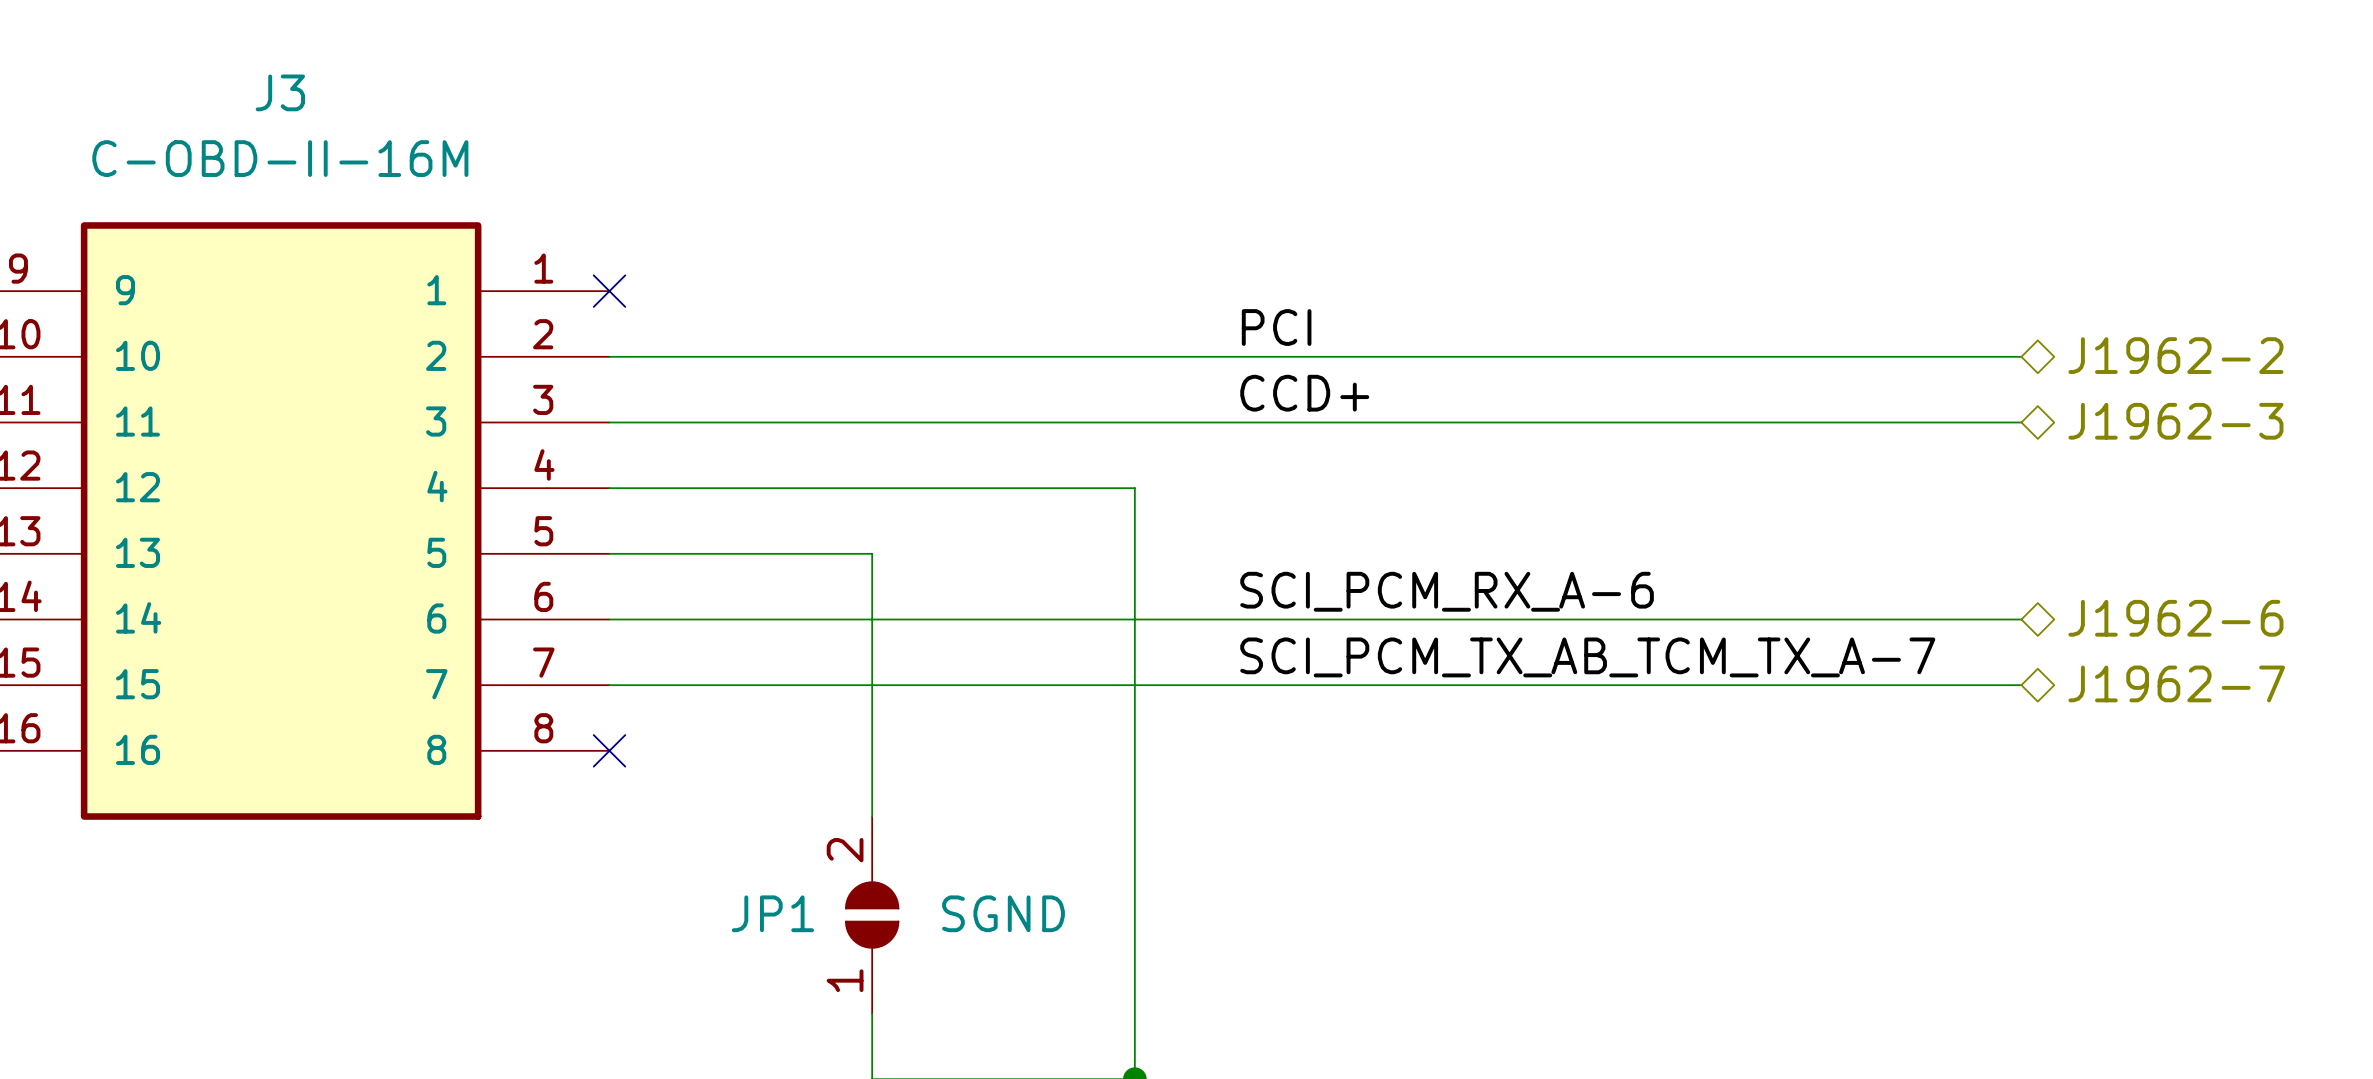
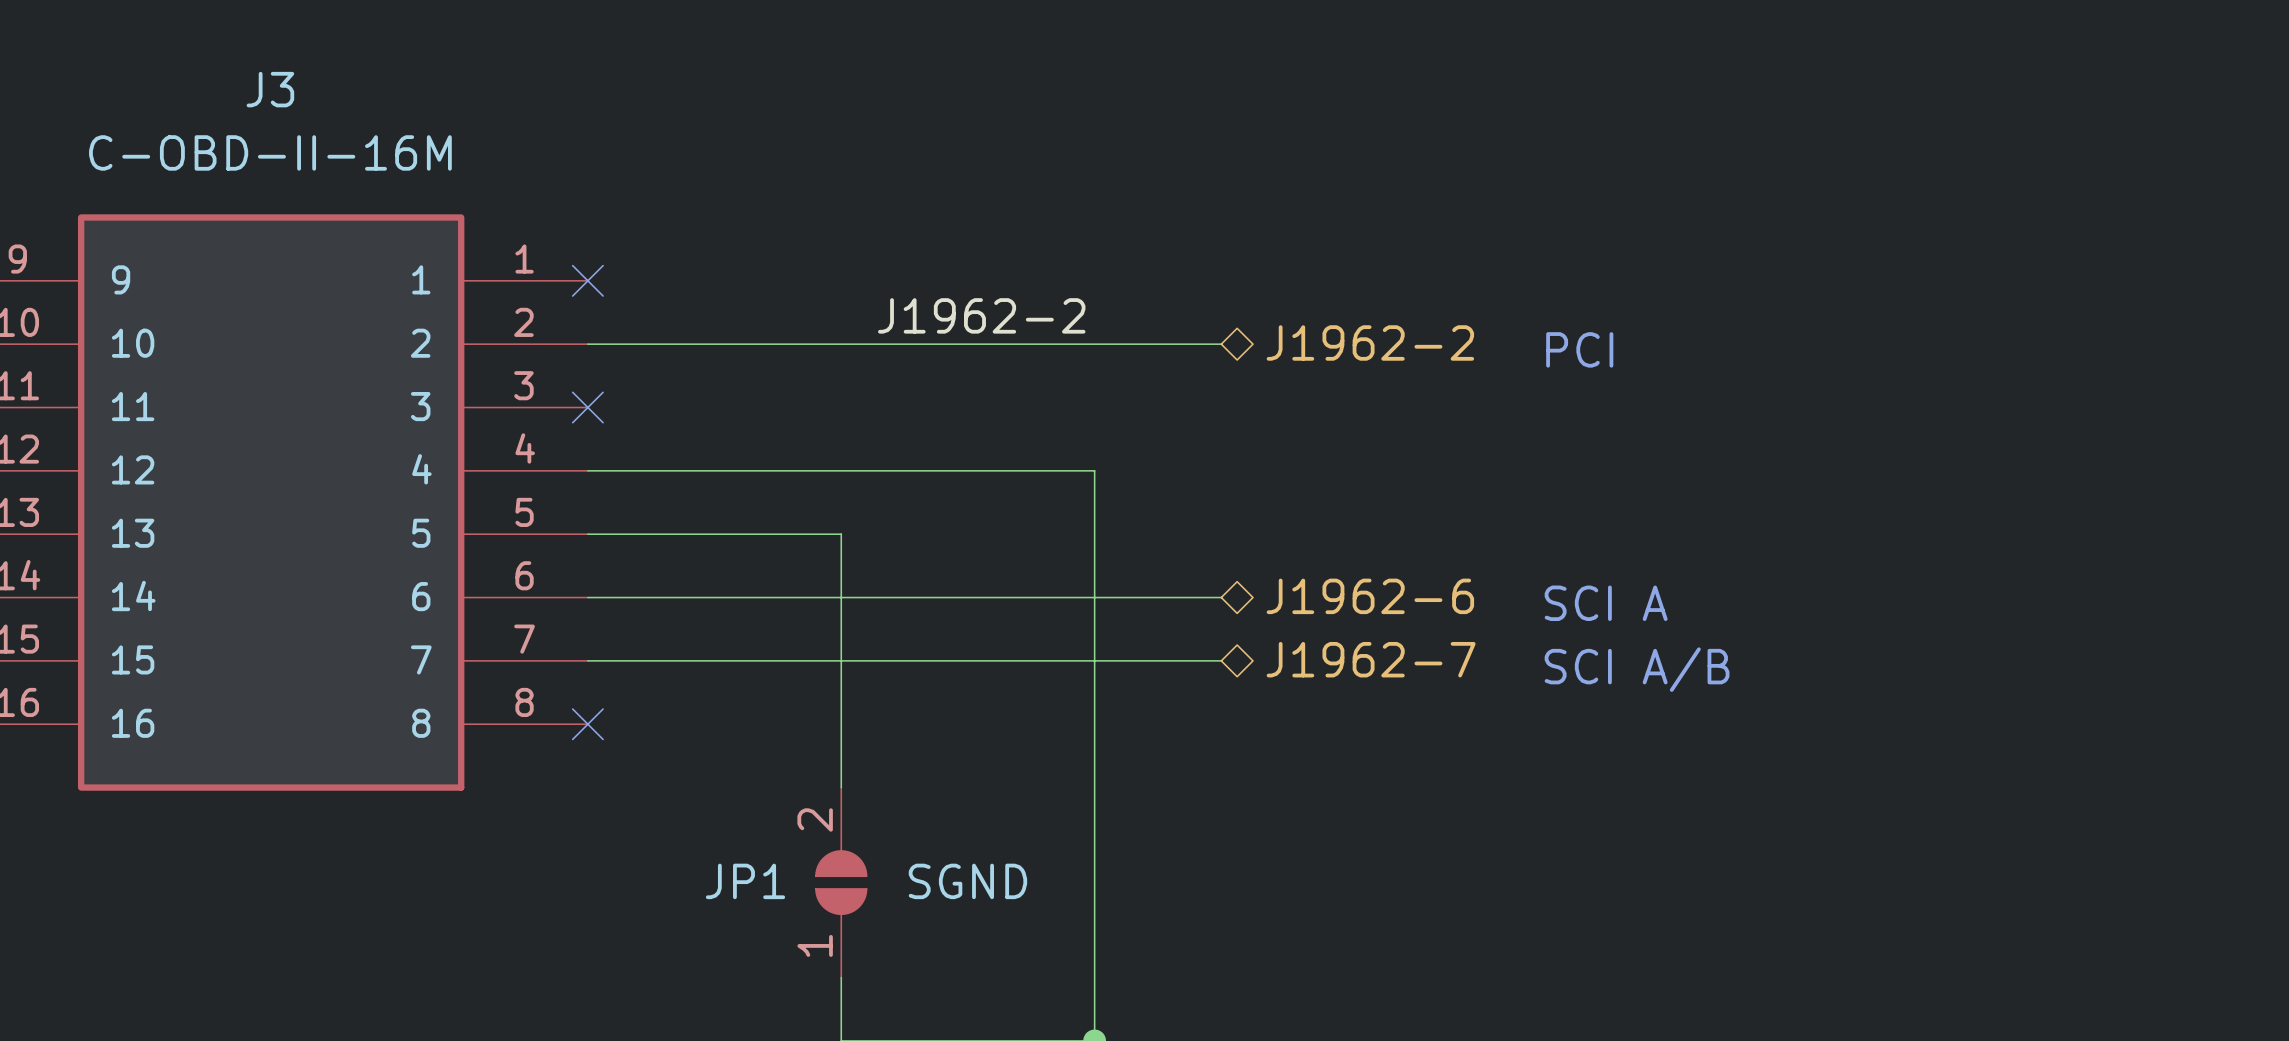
label: none -> J1962-2 (981, 315)
label: PCI (1276, 327) -> none
hierarchical label: none -> J1962-2 (1370, 342)
hierarchical label: J1962-2 (2175, 355) -> none
wire: (1266, 356) (2021, 356) -> none
text: none -> PCI (1579, 349)
label: CCD+ (1304, 393) -> none
hierarchical label: J1962-3 (2175, 421) -> none
wire: (609, 422) (2021, 422) -> none
no-connect mark: none -> (587, 407)
label: SCI_PCM_RX_A-6 (1447, 591) -> none
hierarchical label: none -> J1962-6 (1370, 596)
hierarchical label: J1962-6 (2175, 618) -> none
wire: (1266, 619) (2021, 619) -> none
text: none -> SCI A (1606, 603)
label: SCI_PCM_TX_AB_TCM_TX_A-7 (1587, 657) -> none
hierarchical label: none -> J1962-7 (1371, 659)
hierarchical label: J1962-7 (2176, 683) -> none
wire: (1266, 685) (2021, 685) -> none
text: none -> SCI A/B (1637, 669)

